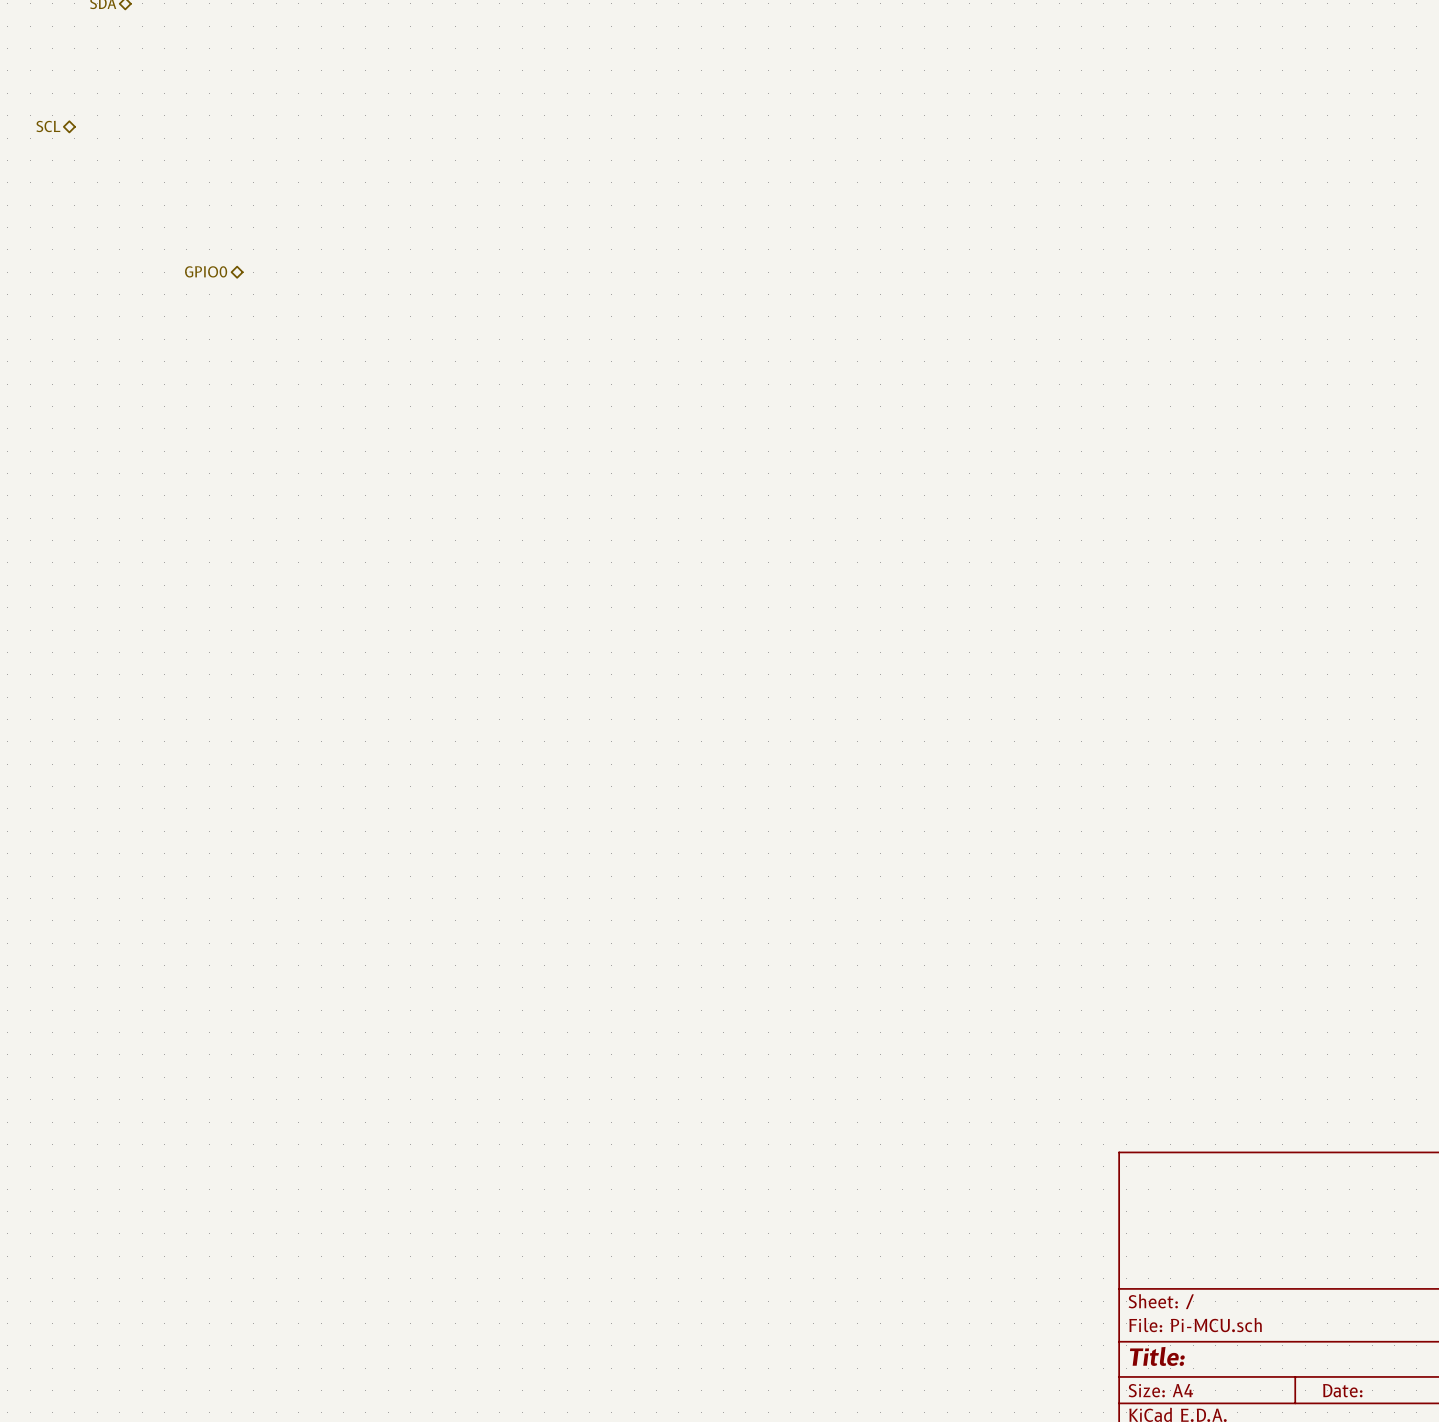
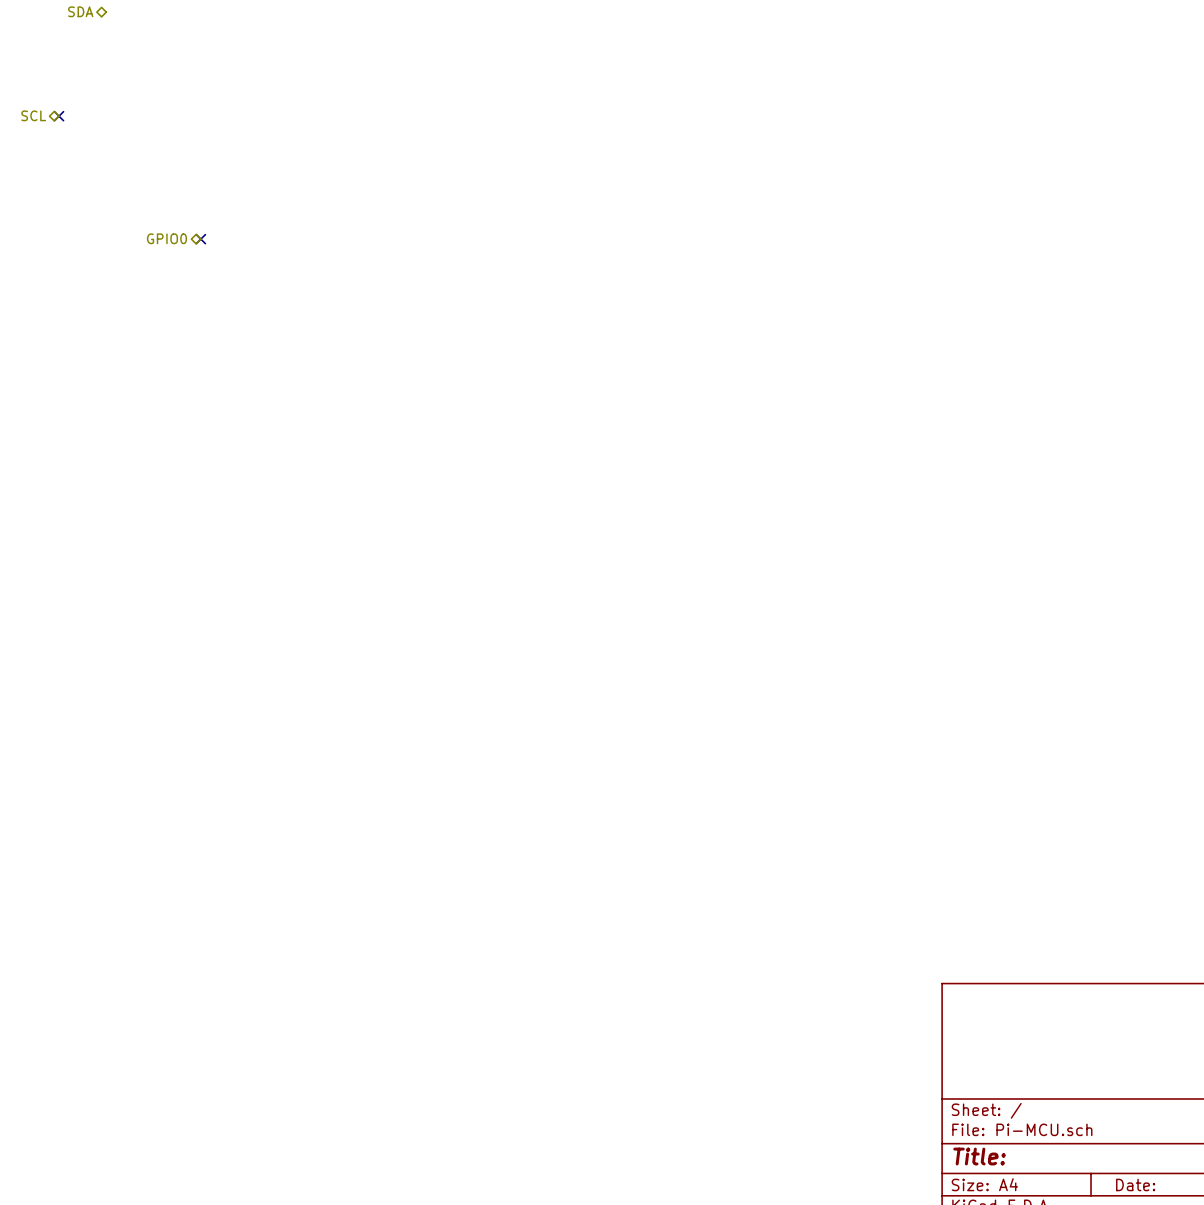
no-connect mark: none -> (59, 116)
no-connect mark: none -> (200, 239)

